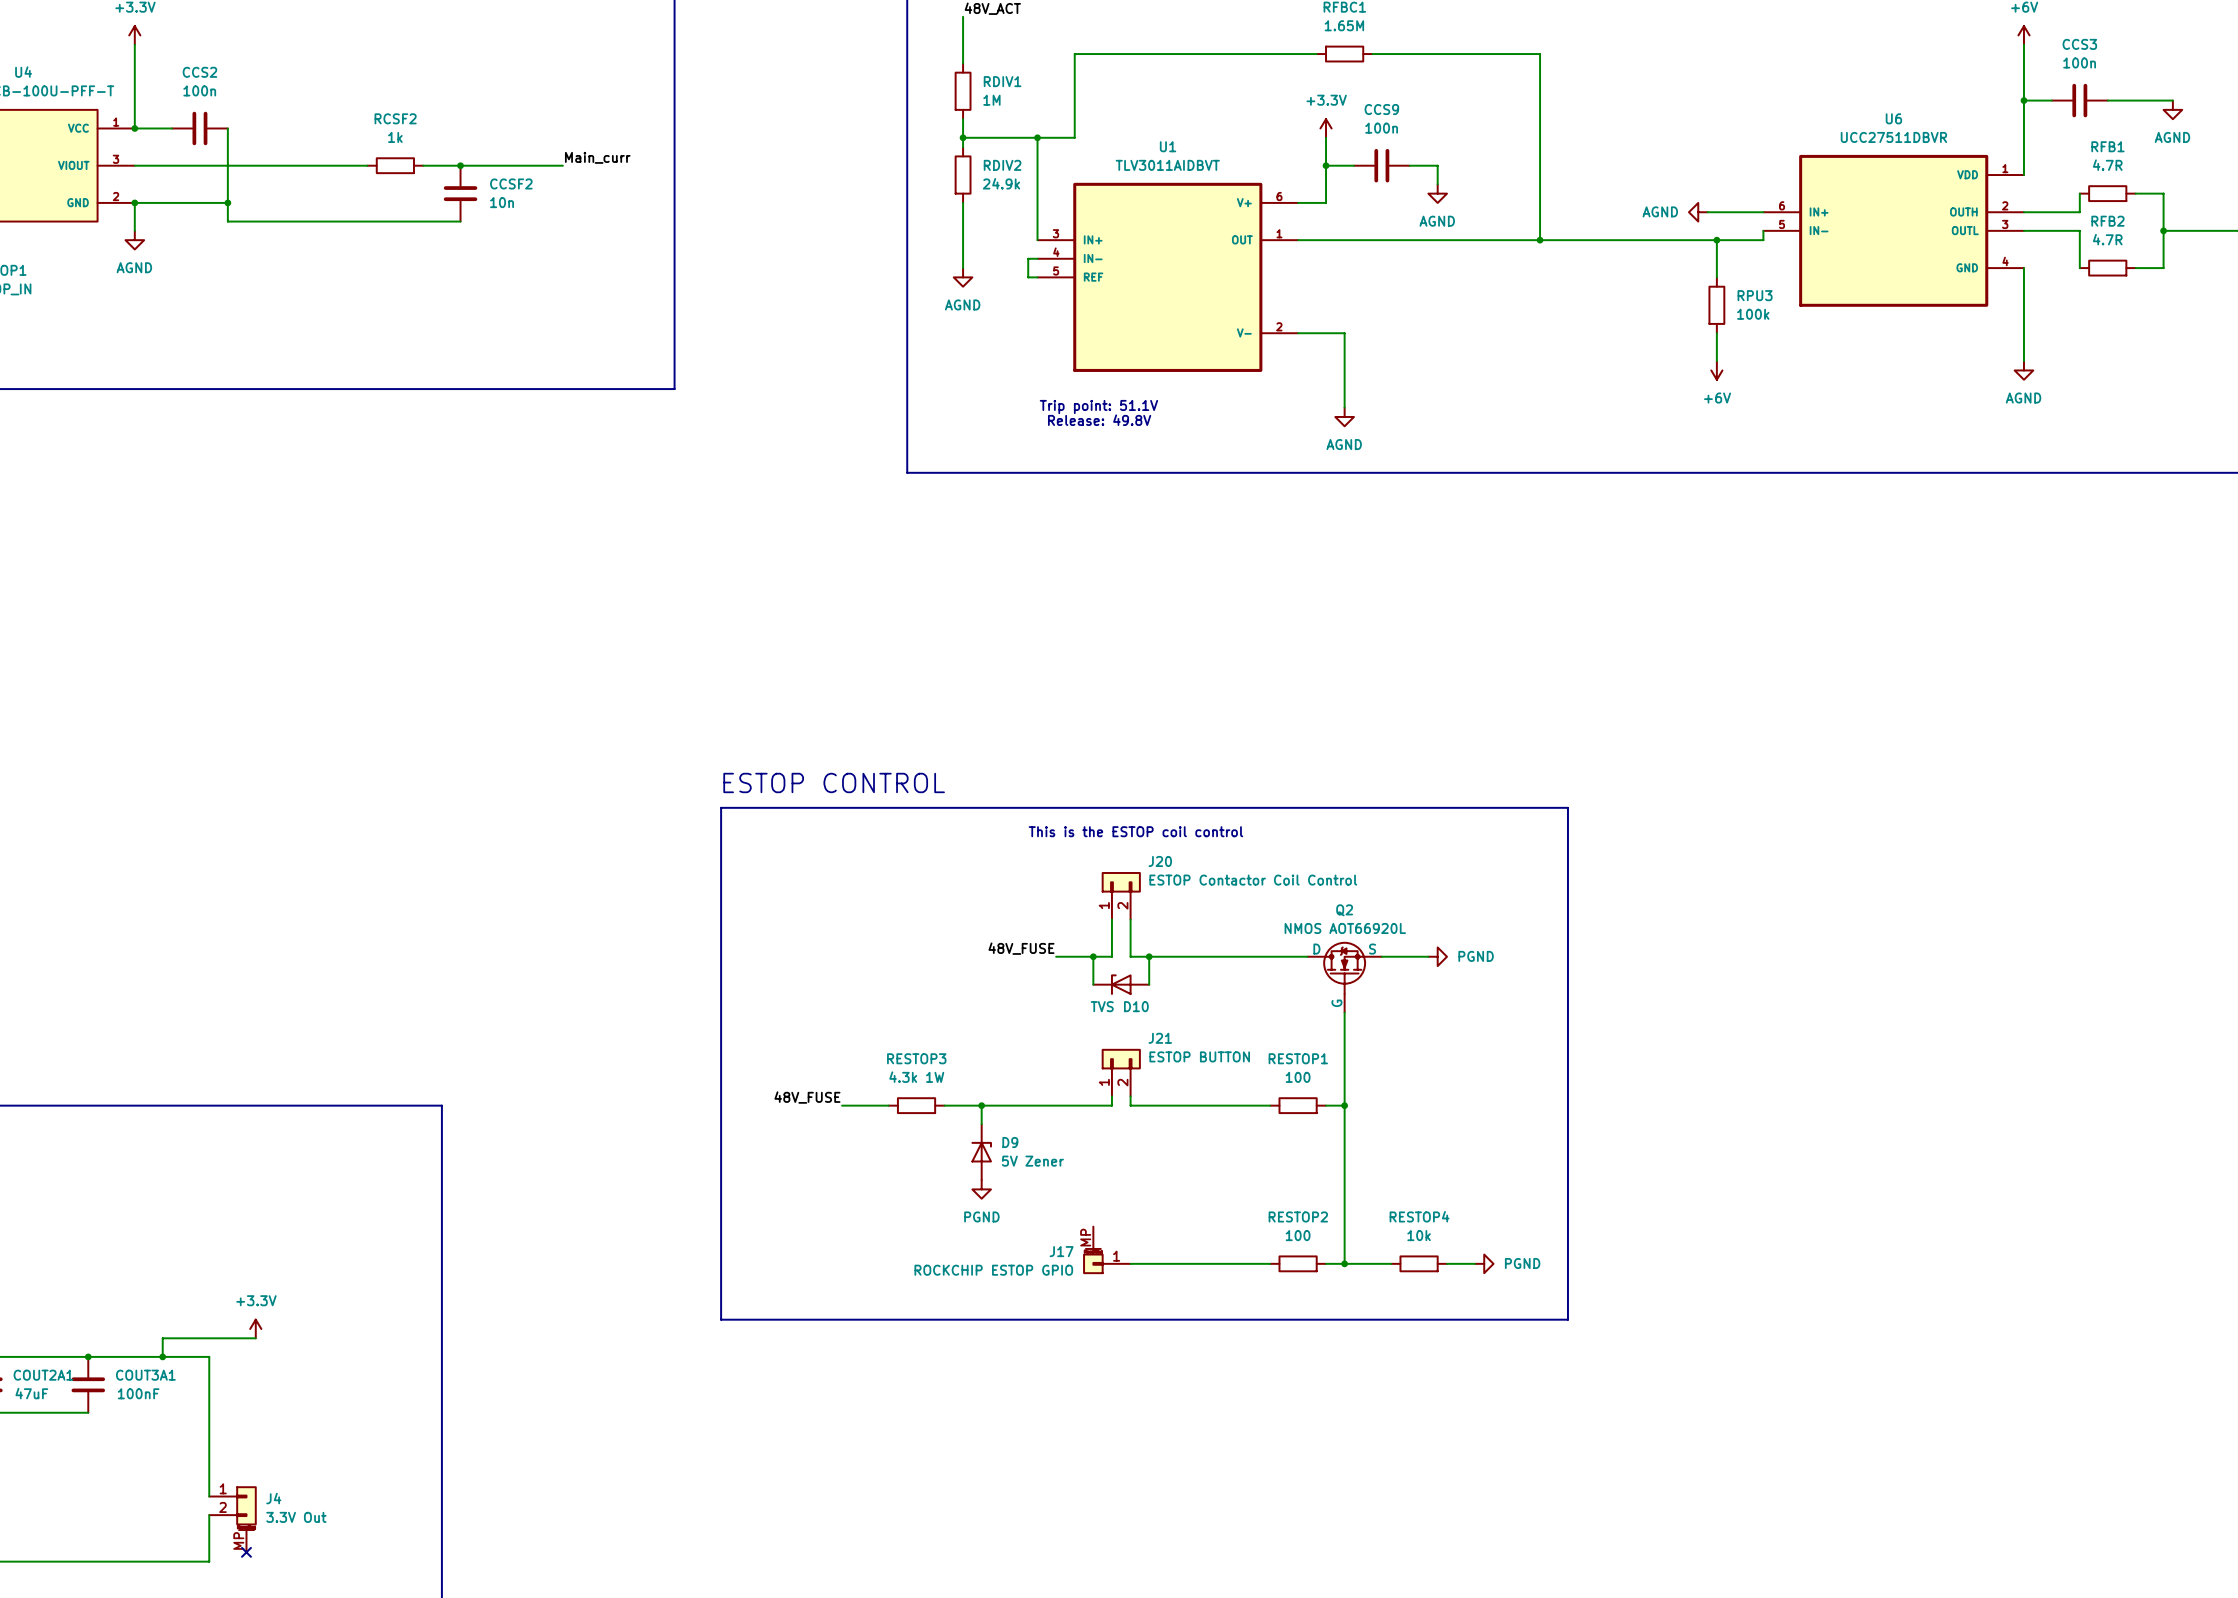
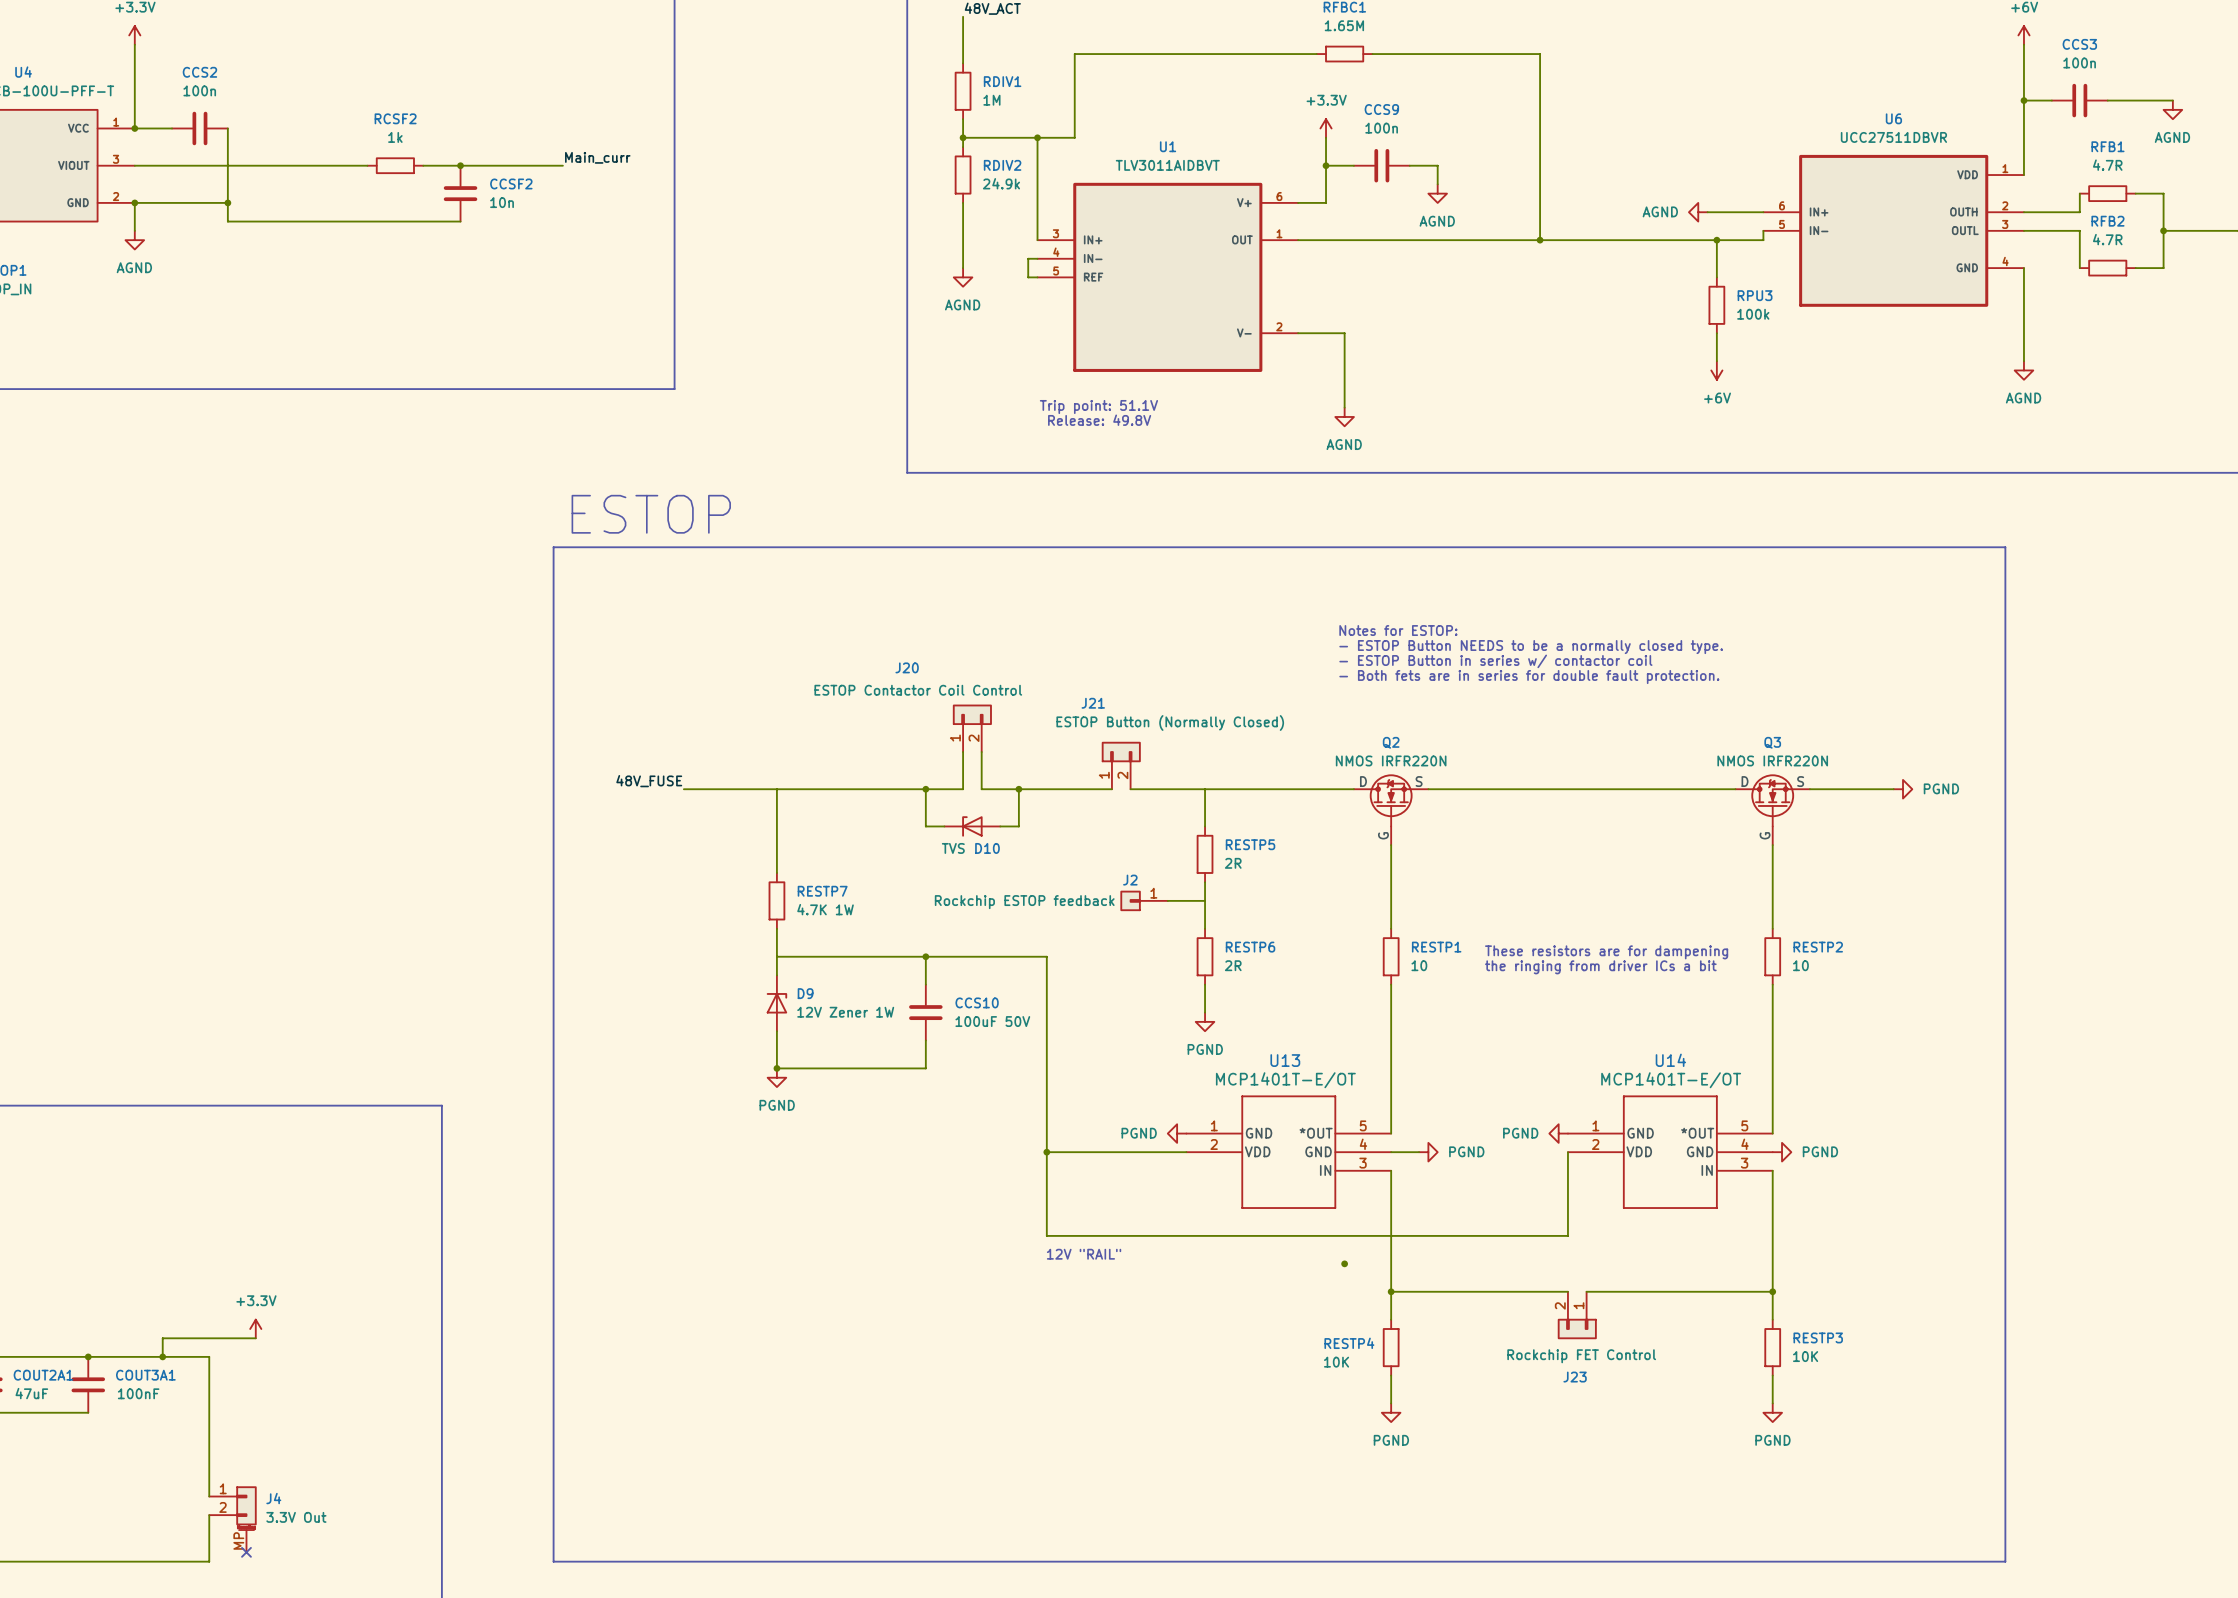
text: none -> ESTOP (651, 514)
line: none -> (553, 547) (2005, 547) (2005, 1561) (553, 1561) (553, 547)
text: none -> Notes for ESTOP: (1398, 630)
text: none -> - ESTOP Button NEEDS to be a normally closed type. (1531, 647)
text: none -> - ESTOP Button in series w/ contactor coil (1495, 661)
text: none -> - Both fets are in series for double fault protection. (1529, 677)
wire: none -> (963, 752) (963, 789) (683, 789)
wire: none -> (981, 752) (981, 789) (1111, 789)
label: none -> 48V_FUSE (649, 781)
text: ESTOP CONTROL (834, 782) -> none
wire: none -> (776, 789) (776, 872)
wire: none -> (925, 789) (925, 826) (944, 826)
junction: none -> (925, 789)
wire: none -> (1018, 789) (1018, 826) (1000, 826)
junction: none -> (1018, 789)
wire: none -> (1130, 789) (1353, 789)
wire: none -> (1205, 789) (1205, 826)
wire: none -> (1428, 789) (1735, 789)
wire: none -> (1809, 789) (1893, 789)
power symbol: none -> PGND (1903, 789)
line: (721, 807) (1567, 807) (1567, 1319) (721, 1319) (721, 807) -> none
Q3: none -> NMOS IRFR220N (1772, 809)
text: This is the ESTOP coil control (1135, 831) -> none
wire: none -> (1391, 845) (1391, 928)
wire: none -> (1772, 845) (1772, 928)
RESTP5: none -> 2R (1205, 854)
J20 name position: J20 (1160, 861) -> J20 (907, 667)
J20 value position: ESTOP Contactor Coil Control (1253, 880) -> ESTOP Contactor Coil Control (918, 690)
wire: none -> (1205, 882) (1205, 928)
J20 position: (1121, 895) -> (972, 728)
RESTP7: none -> 4.7K 1W (776, 900)
J2: none -> Rockchip ESTOP feedback (1144, 900)
wire: none -> (1167, 900) (1205, 900)
wire: (1111, 919) (1111, 956) (1056, 956) -> none
wire: (1130, 919) (1130, 956) (1307, 956) -> none
wire: none -> (776, 928) (776, 975)
Q2 value: NMOS AOT66920L (1345, 928) -> NMOS IRFR220N (1391, 760)
label: 48V_FUSE (1021, 948) -> none
text: none -> These resistors are for dampening (1606, 952)
wire: none -> (776, 956) (1046, 956) (1046, 1235) (1567, 1235) (1567, 1152)
junction: none -> (925, 956)
wire: (1093, 956) (1093, 984) -> (925, 956) (925, 984)
junction: (1093, 956) -> none
wire: (1149, 956) (1149, 984) -> (1205, 984) (1205, 1012)
junction: (1149, 956) -> none
RESTP6: none -> 2R (1205, 956)
wire: (1381, 956) (1428, 956) -> none
RESTP1: none -> 10 (1391, 956)
power symbol: PGND (1437, 956) -> none
RESTP2: none -> 10 (1772, 956)
text: none -> the ringing from driver ICs a bit (1600, 967)
Q2 position: (1344, 977) -> (1391, 809)
D10 position: (1121, 984) -> (972, 826)
wire: none -> (1391, 984) (1391, 1133)
wire: none -> (1772, 984) (1772, 1133)
CCS10: none -> 100uF 50V (925, 1012)
wire: (1344, 1012) (1344, 1263) -> none
power symbol: none -> PGND (1205, 1021)
wire: none -> (776, 1031) (776, 1068) (925, 1068) (925, 1040)
J21 name position: J21 (1160, 1038) -> J21 (1093, 703)
J21 value: ESTOP BUTTON (1199, 1056) -> ESTOP Button (Normally Closed) (1170, 722)
junction: none -> (776, 1068)
J21 position: (1121, 1072) -> (1121, 765)
power symbol: none -> PGND (776, 1077)
wire: (1111, 1096) (1111, 1105) (944, 1105) -> none
wire: (1130, 1096) (1130, 1105) (1270, 1105) -> none
label: 48V_FUSE (807, 1097) -> none
wire: (842, 1105) (888, 1105) -> none
RESTOP3: 4.3k 1W (916, 1105) -> none
wire: (981, 1105) (981, 1124) -> none
junction: (981, 1105) -> none
RESTOP1: 100 (1298, 1105) -> none
wire: (1326, 1105) (1344, 1105) -> none
junction: (1344, 1105) -> none
power symbol: none -> PGND (1177, 1133)
power symbol: none -> PGND (1558, 1133)
D9 position: (981, 1152) -> (776, 1003)
junction: none -> (1046, 1152)
U13: none -> MCP1401T-E/OT (1288, 1152)
power symbol: none -> PGND (1428, 1152)
U14: none -> MCP1401T-E/OT (1670, 1152)
power symbol: none -> PGND (1782, 1152)
D9 value: 5V Zener (1032, 1161) -> 12V Zener 1W (845, 1012)
wire: none -> (1391, 1170) (1391, 1319)
wire: none -> (1772, 1170) (1772, 1319)
power symbol: PGND (981, 1189) -> none
J17: ROCKCHIP ESTOP GPIO (1106, 1250) -> none
text: none -> 12V "RAIL" (1084, 1254)
wire: (1130, 1263) (1270, 1263) -> (1046, 1152) (1186, 1152)
RESTOP2: 100 (1298, 1263) -> none
wire: (1326, 1263) (1391, 1263) -> none
RESTOP4: 10k (1419, 1263) -> none
wire: (1446, 1263) (1474, 1263) -> (1391, 1152) (1419, 1152)
power symbol: PGND (1484, 1263) -> none
wire: none -> (1391, 1291) (1567, 1291)
junction: none -> (1391, 1291)
wire: none -> (1586, 1291) (1772, 1291)
junction: none -> (1772, 1291)
J23: none -> Rockchip FET Control (1577, 1315)
RESTP4: none -> 10K (1391, 1347)
RESTP3: none -> 10K (1772, 1347)
wire: none -> (1391, 1375) (1391, 1403)
wire: none -> (1772, 1375) (1772, 1403)
power symbol: none -> PGND (1391, 1412)
power symbol: none -> PGND (1772, 1412)

